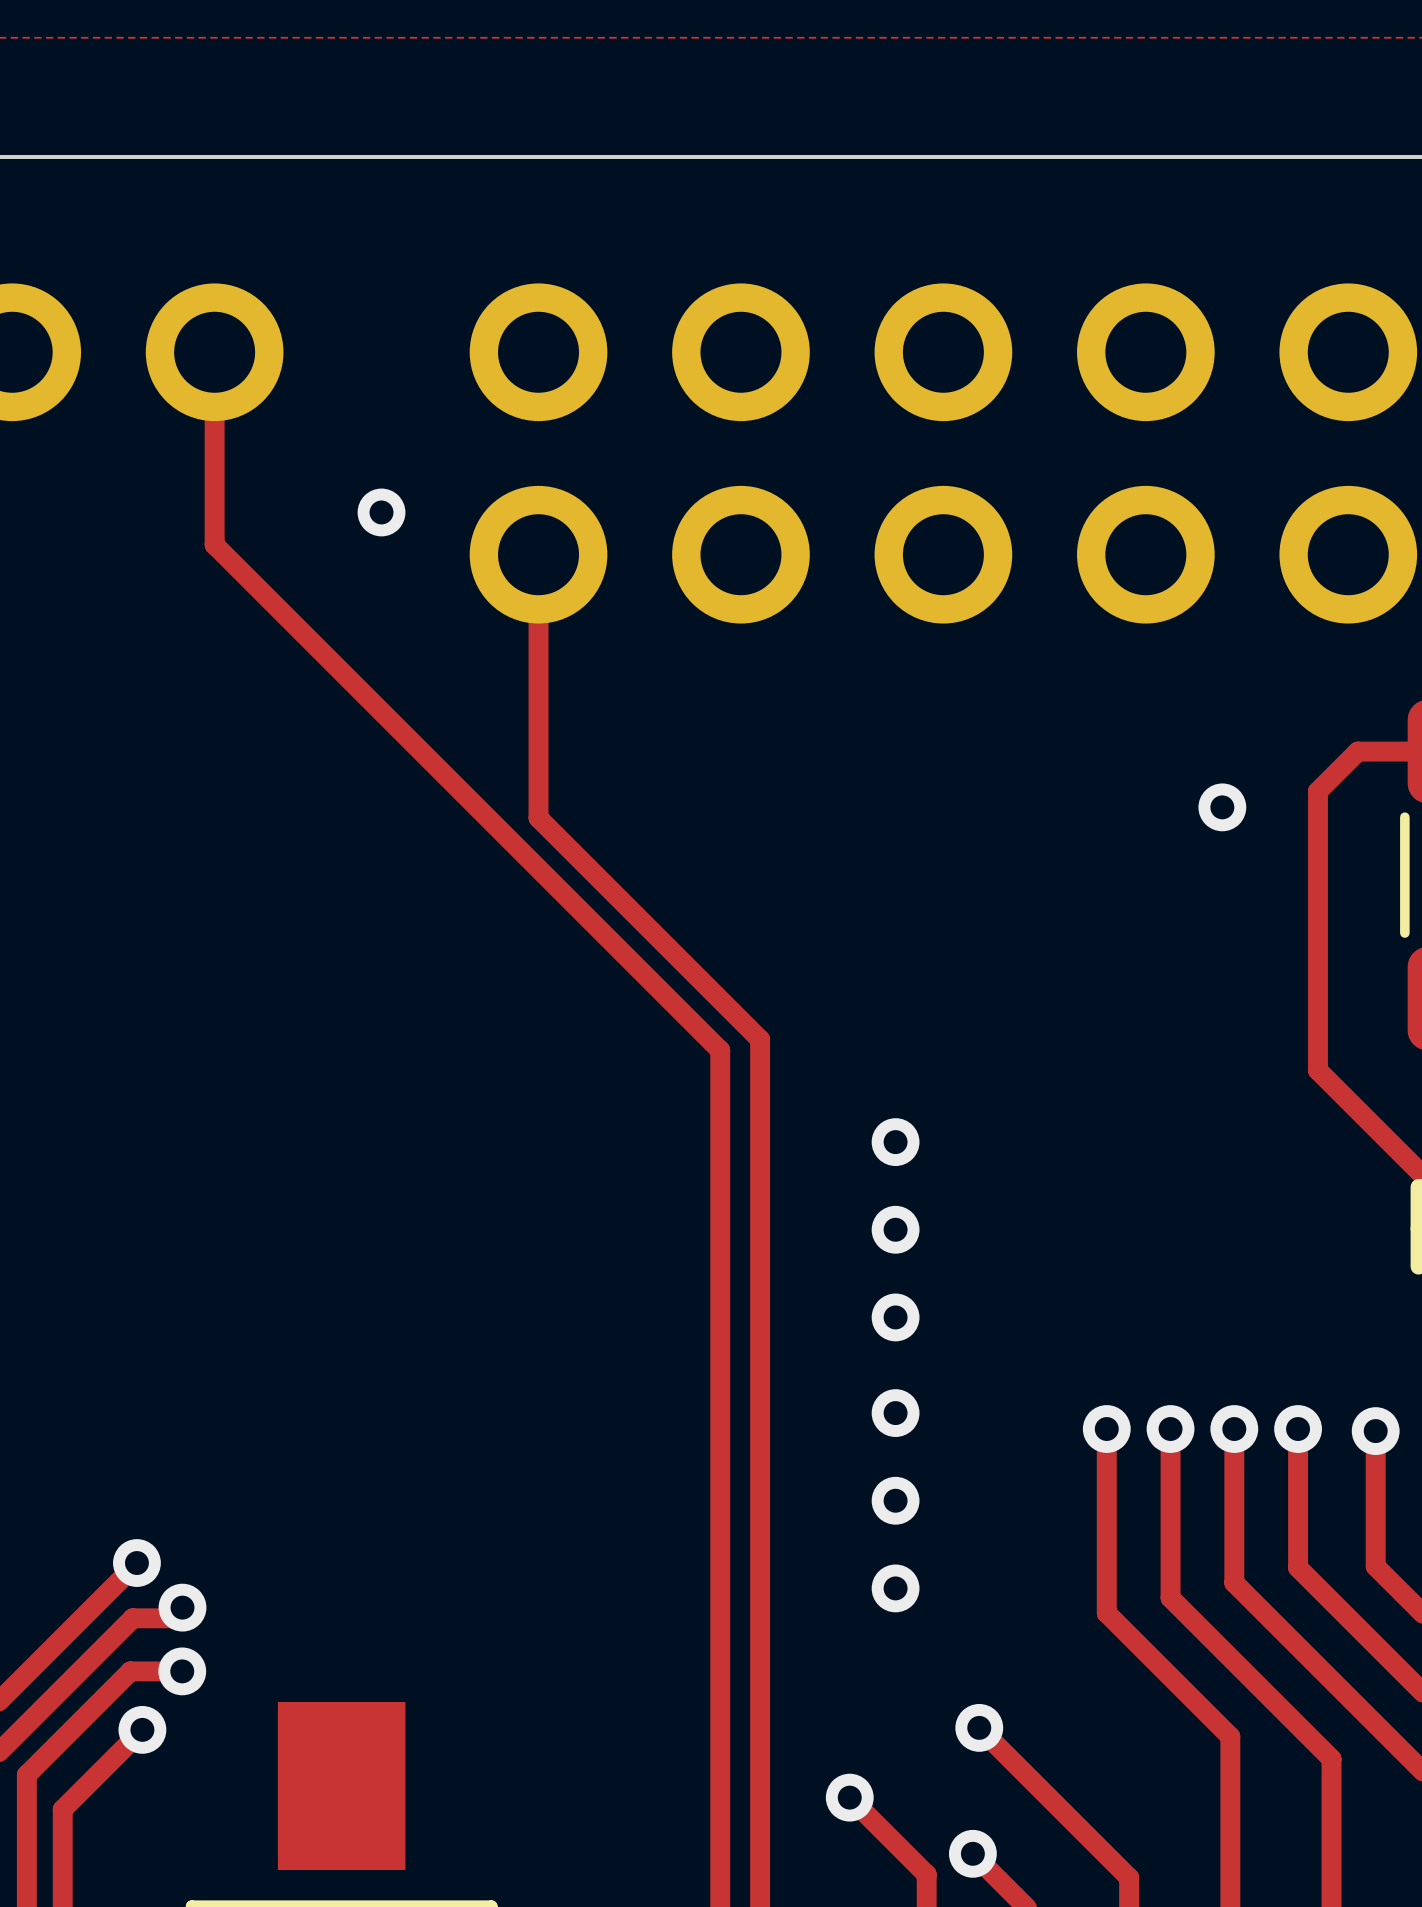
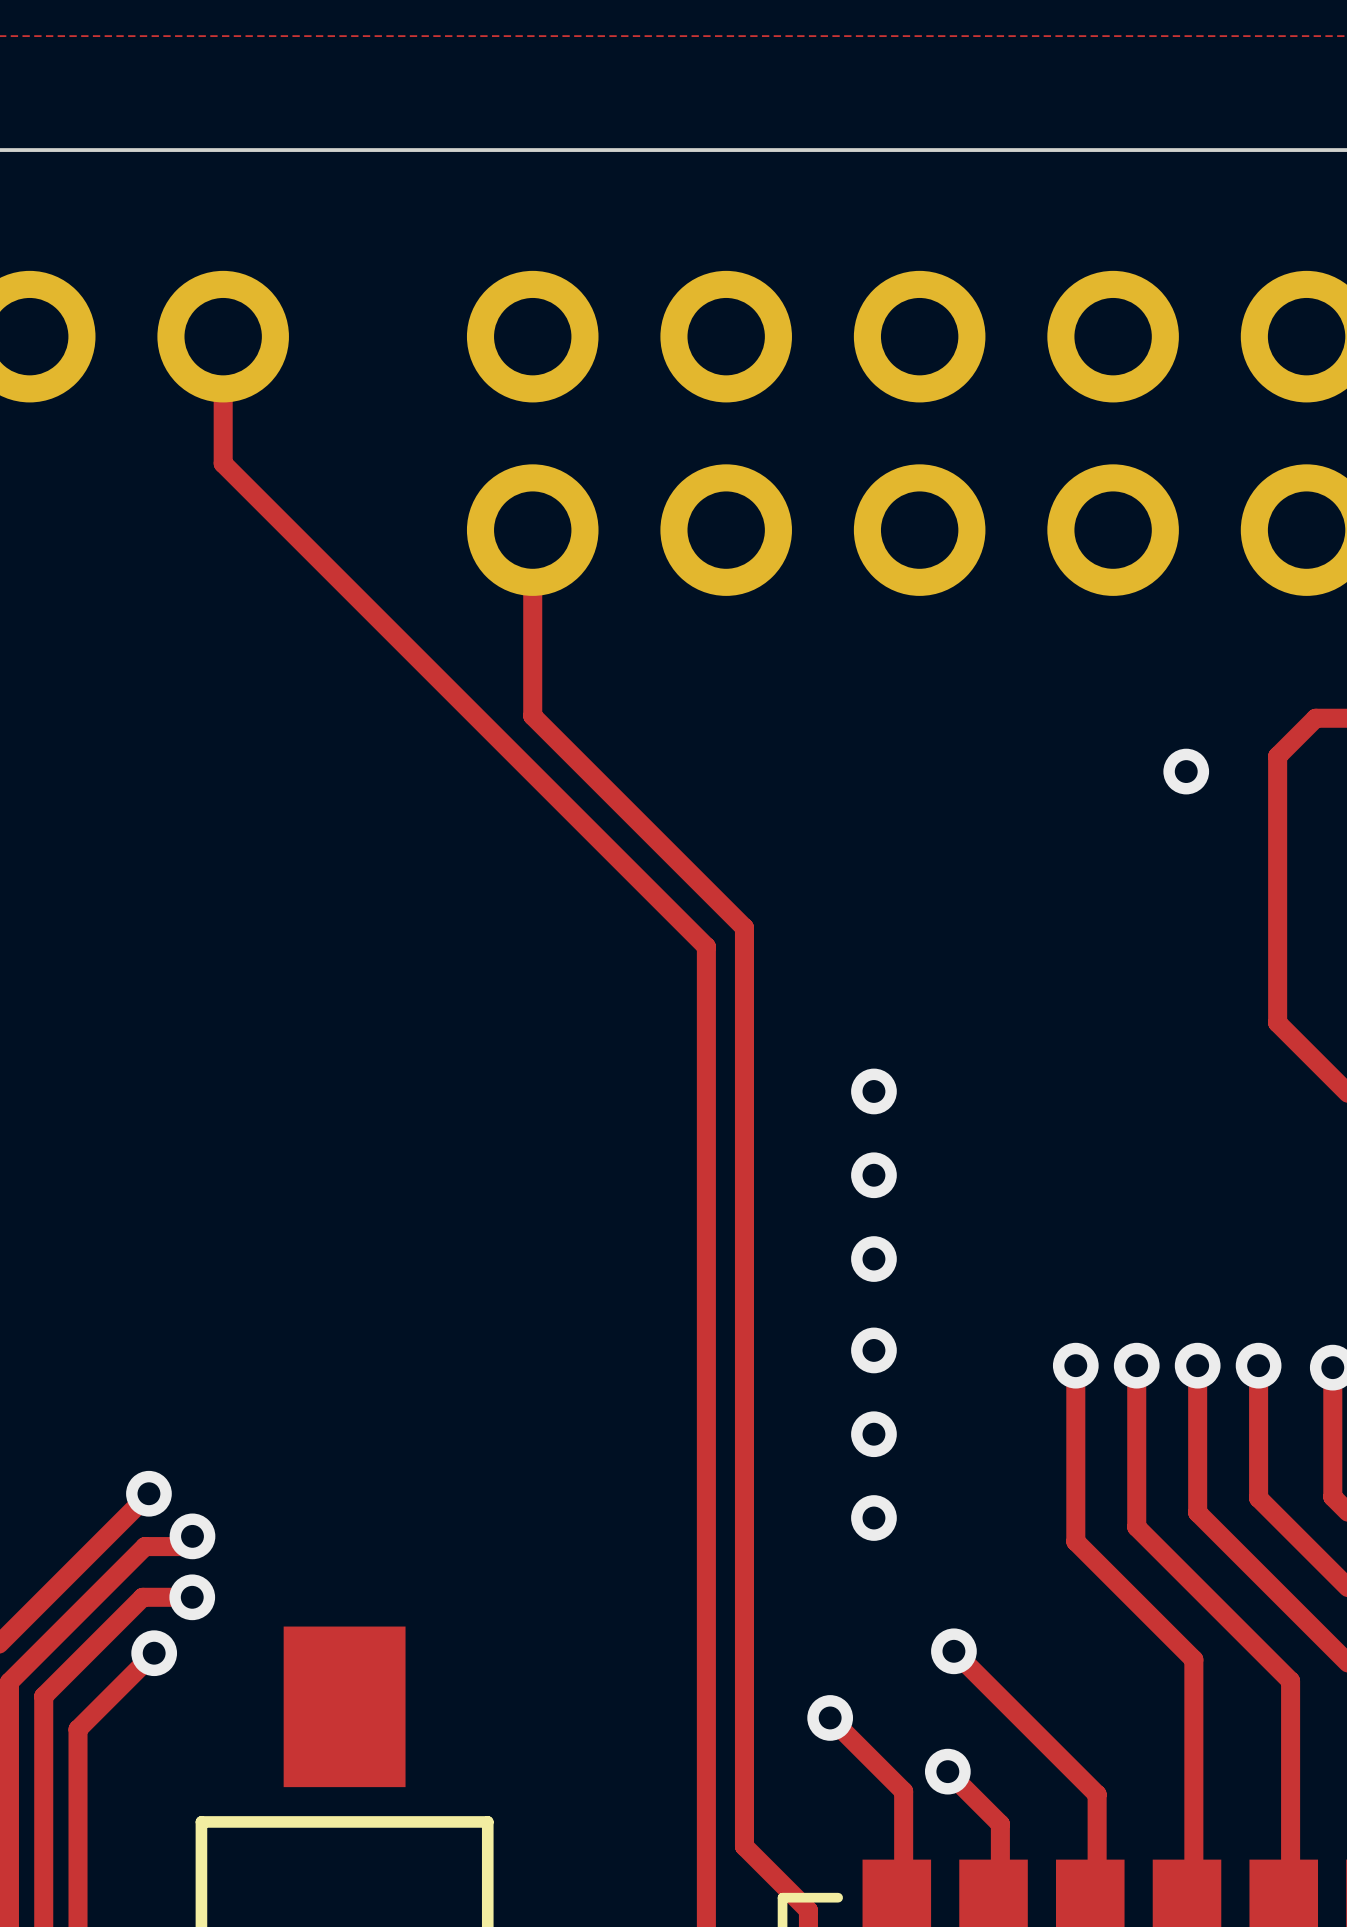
track: (214, 485) (214, 544) (720, 1050) -> (223, 463) (706, 946) (706, 1003)
via: (381, 512) -> none
track: (538, 749) (538, 818) (760, 1039) -> (532, 715) (744, 927) (744, 993)

